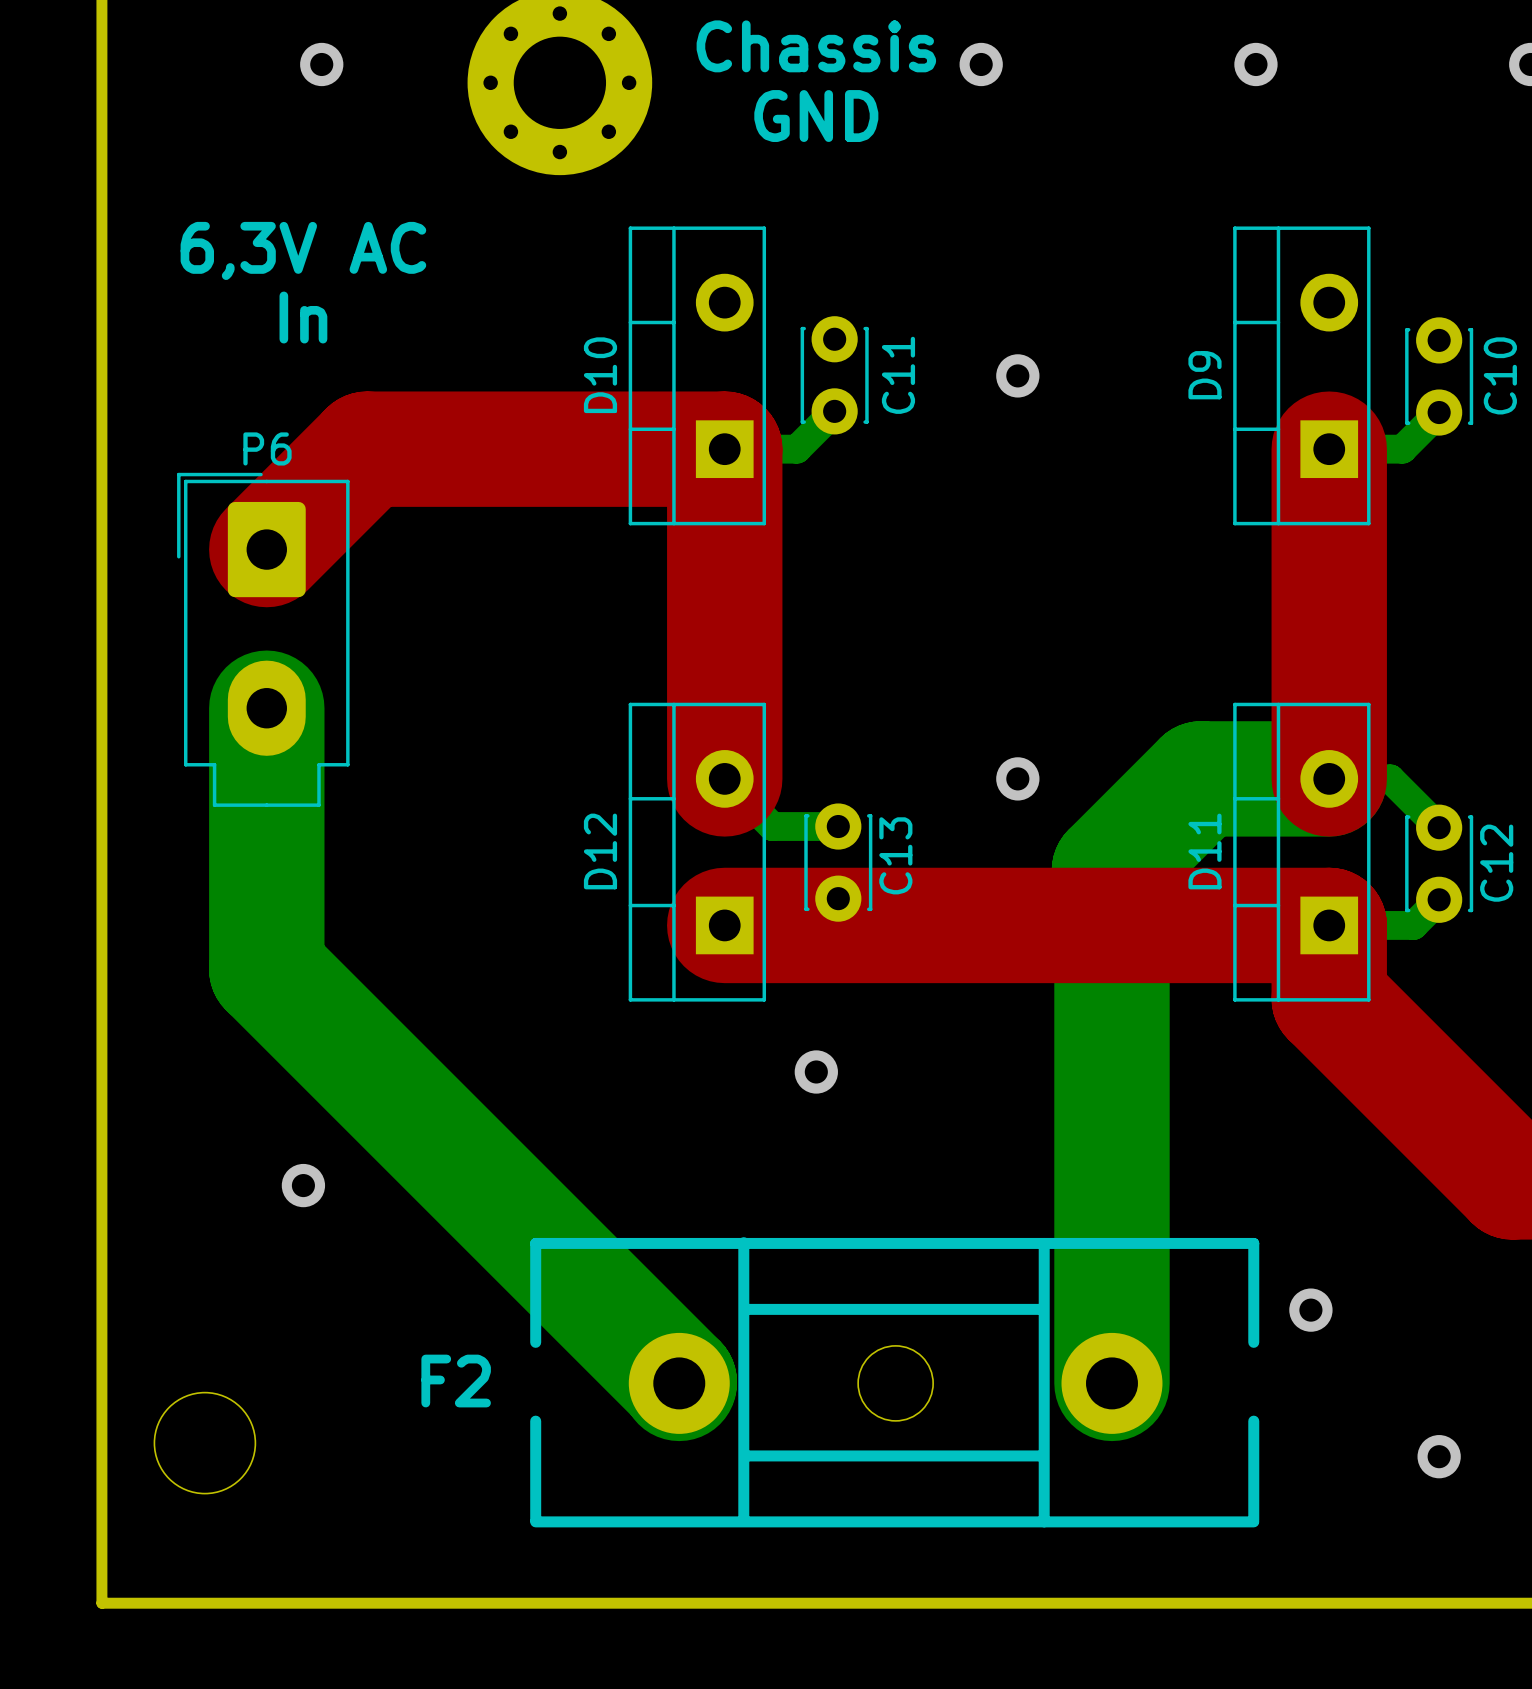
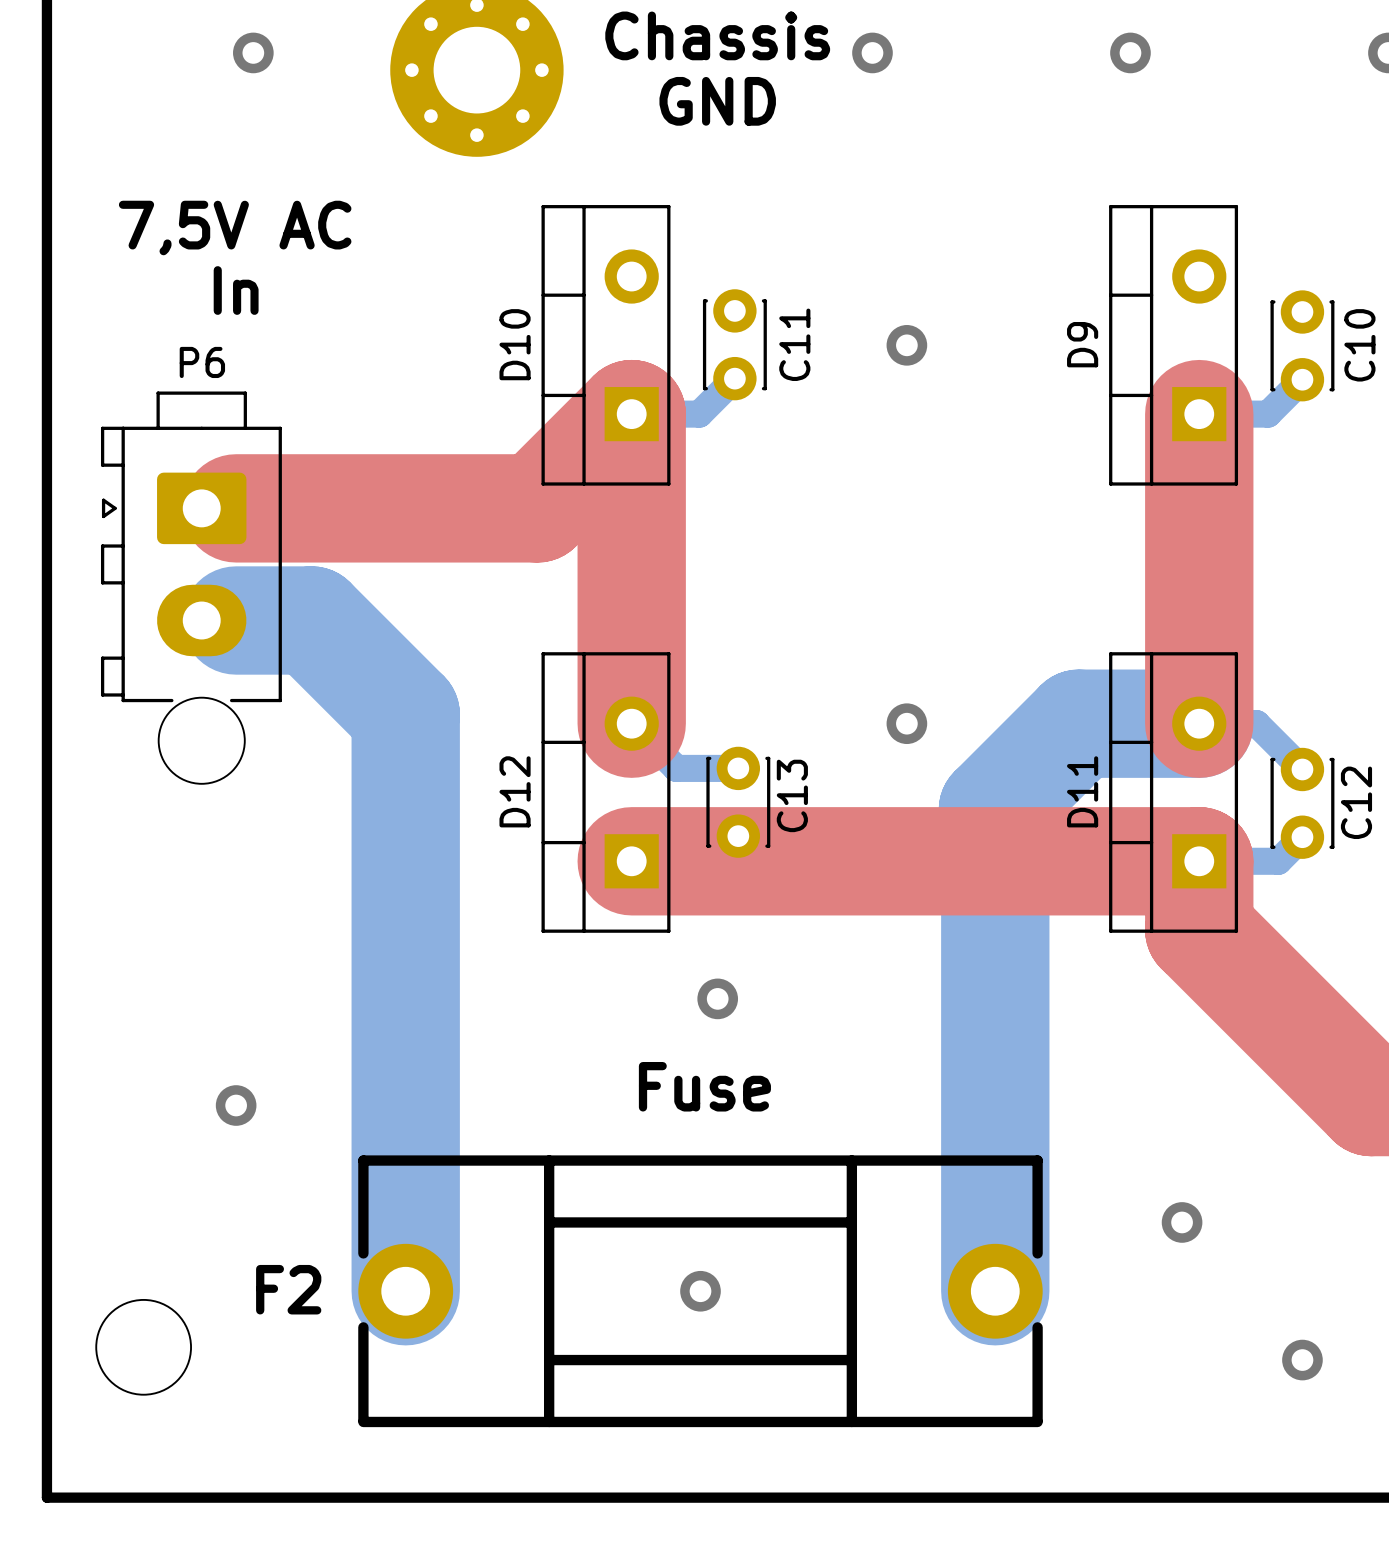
text: 6,3V AC (303, 250) -> 7,5V AC (235, 228)
top track: (724, 449) (367, 449) (266, 549) -> (631, 414) (537, 508) (236, 508)
P6 footprint: [177, 472, 350, 807] -> [100, 391, 282, 784]
bottom track: none -> (236, 620) (311, 620) (405, 714) (405, 1291)
bottom track: (266, 708) (266, 969) (679, 1383) -> none
F2 value: none -> Fuse (704, 1086)
F2 footprint: [530, 1237, 1260, 1528] -> [358, 1155, 1043, 1428]
via: none -> (700, 1291)

